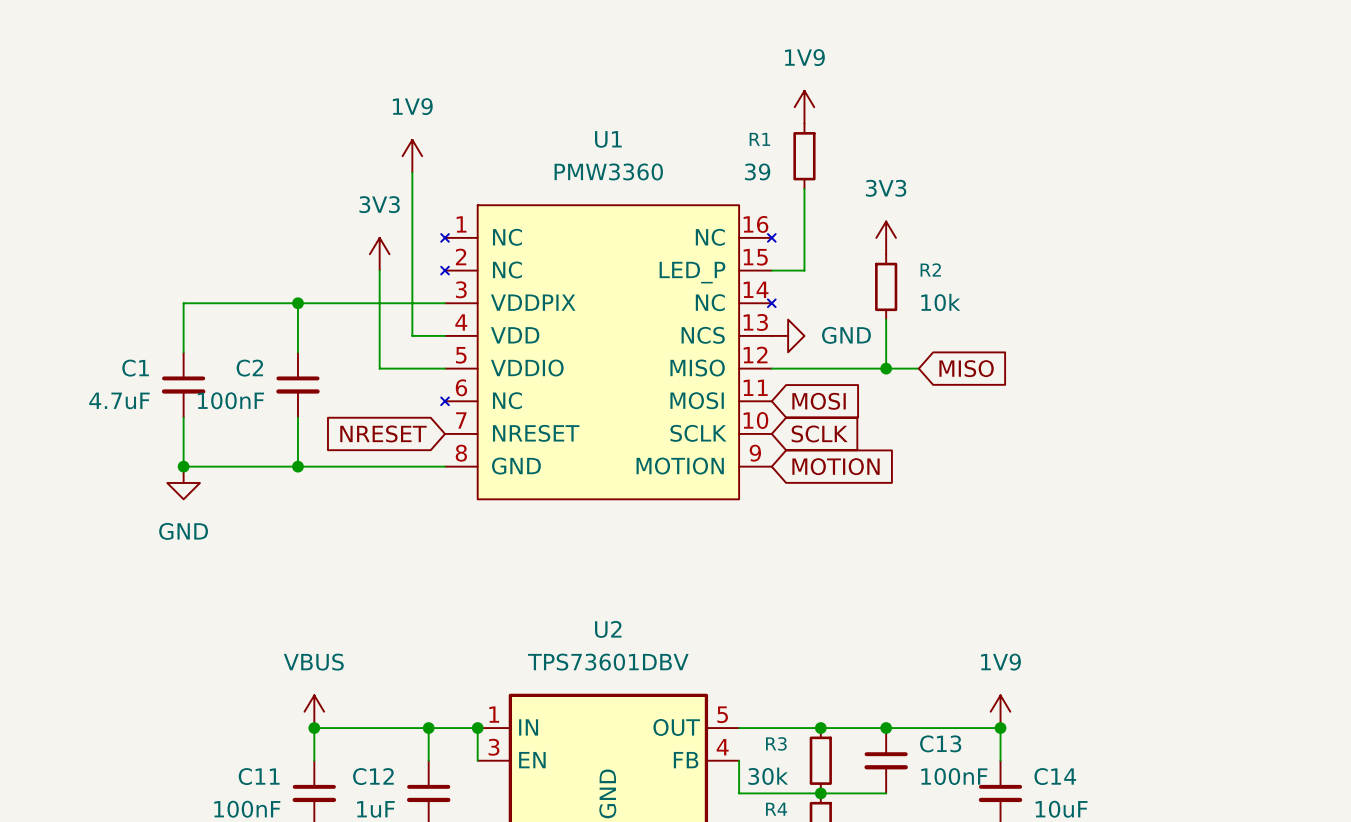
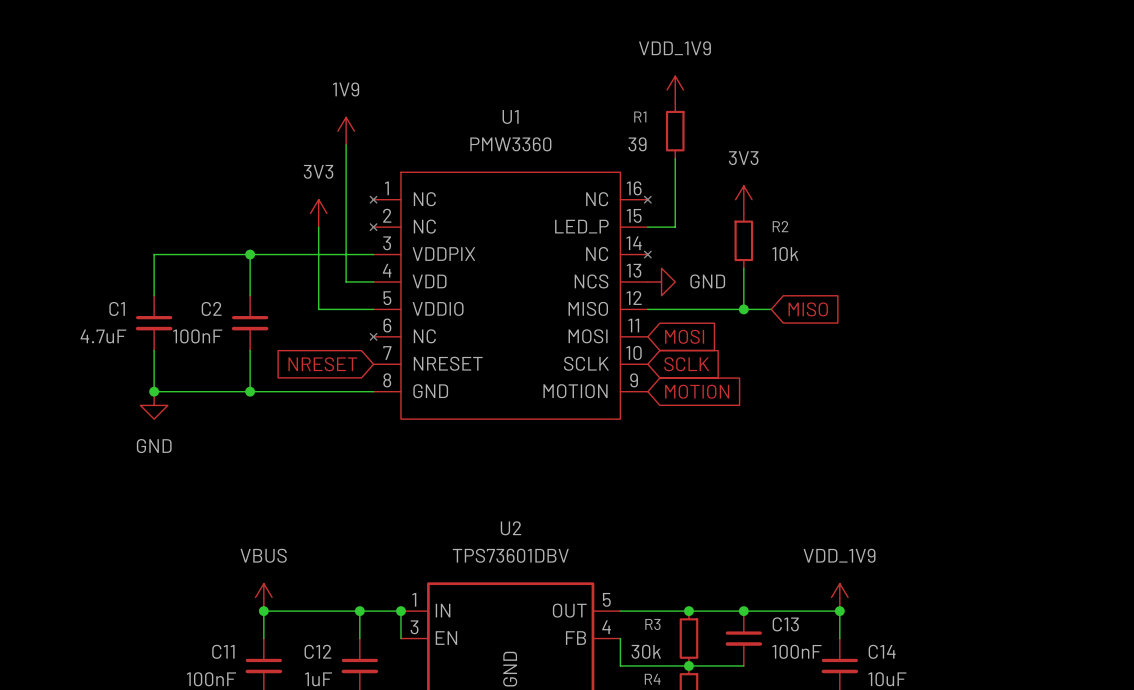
power symbol: 1V9 (804, 107) -> VDD_1V9 (675, 89)
power symbol: 1V9 (1000, 711) -> VDD_1V9 (839, 597)

